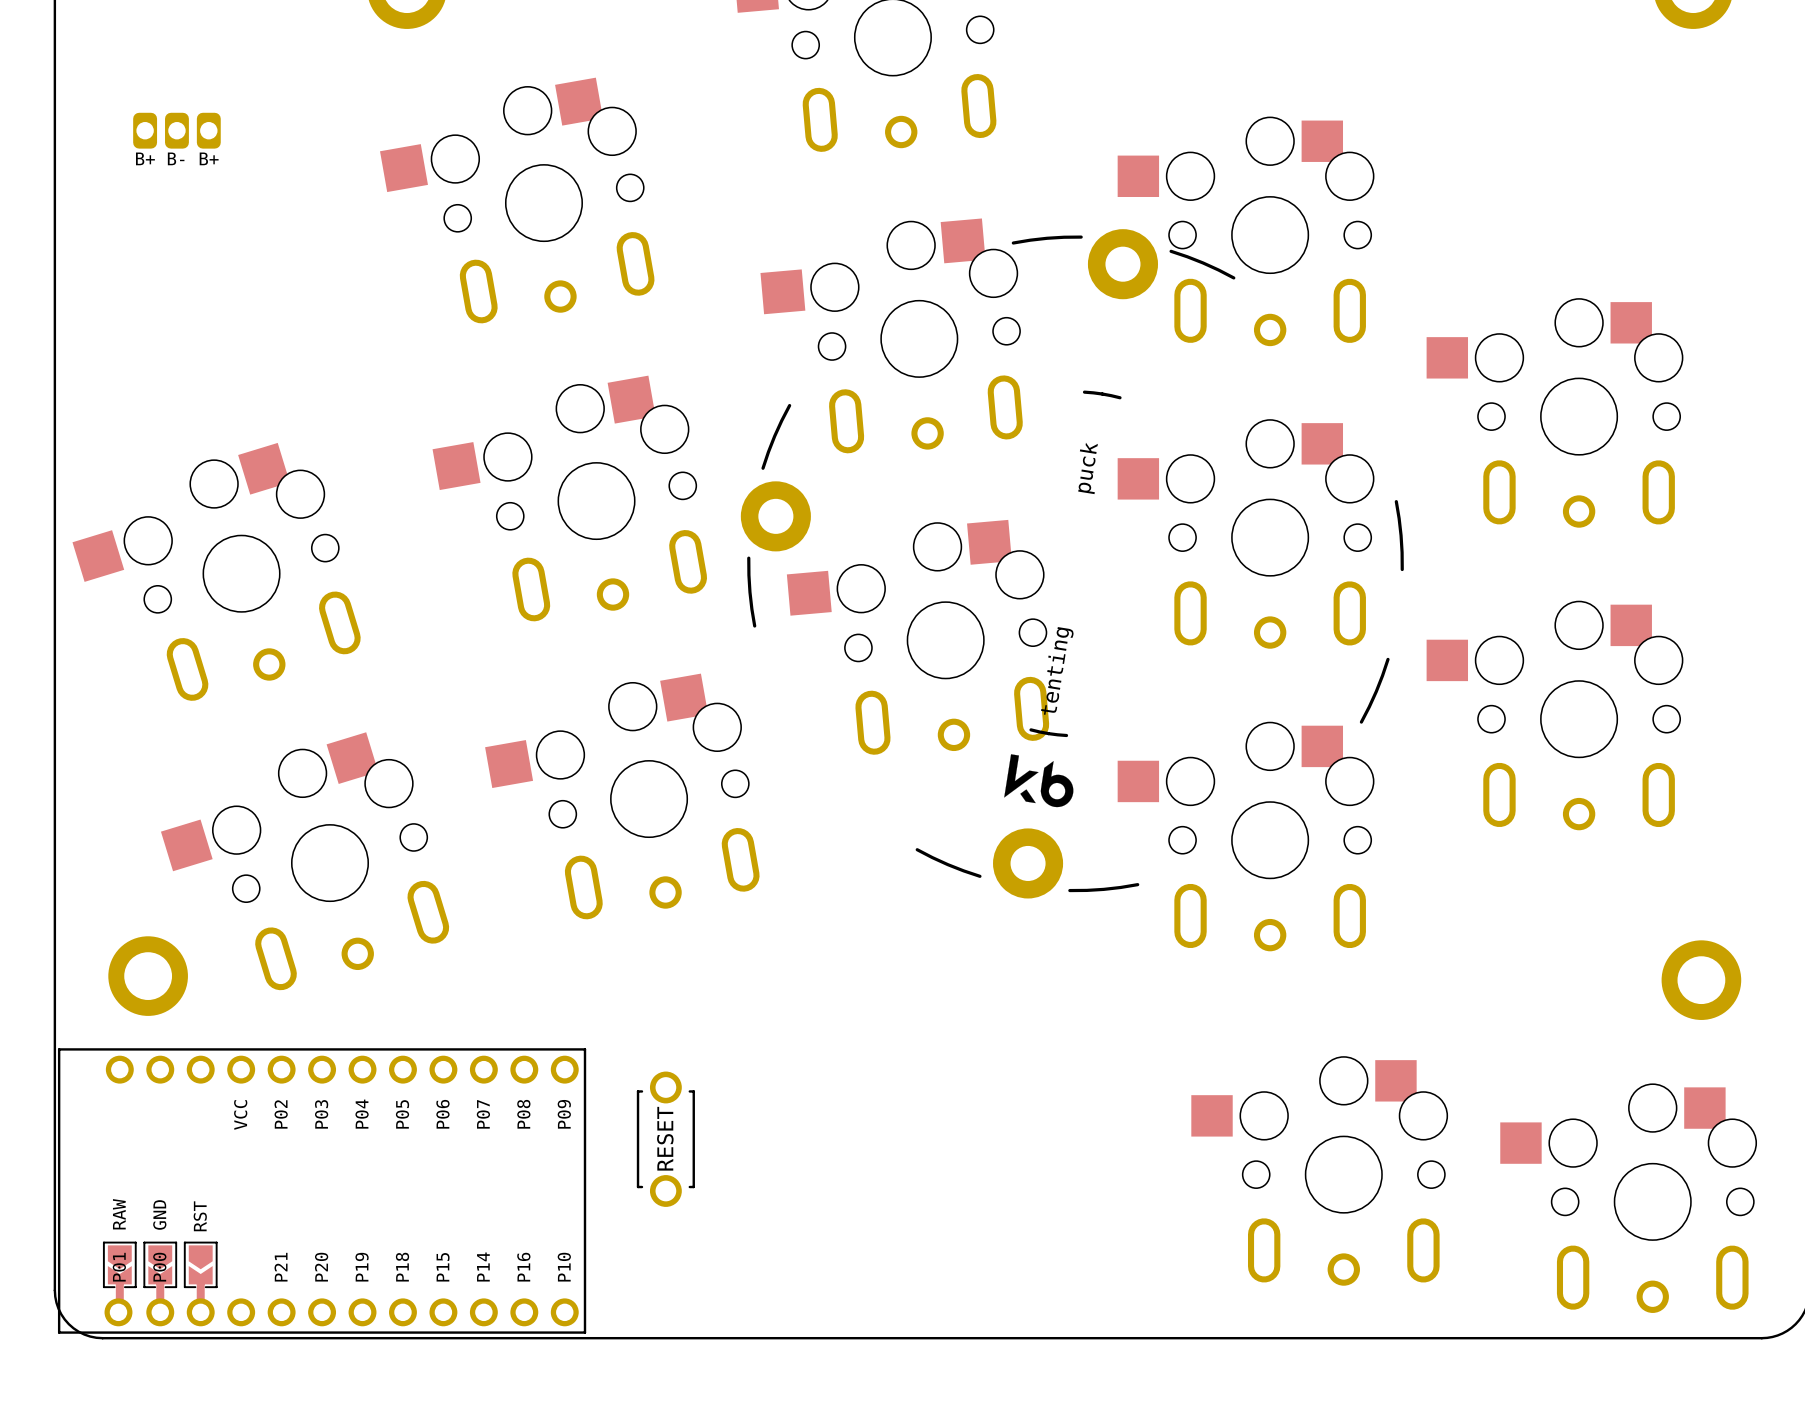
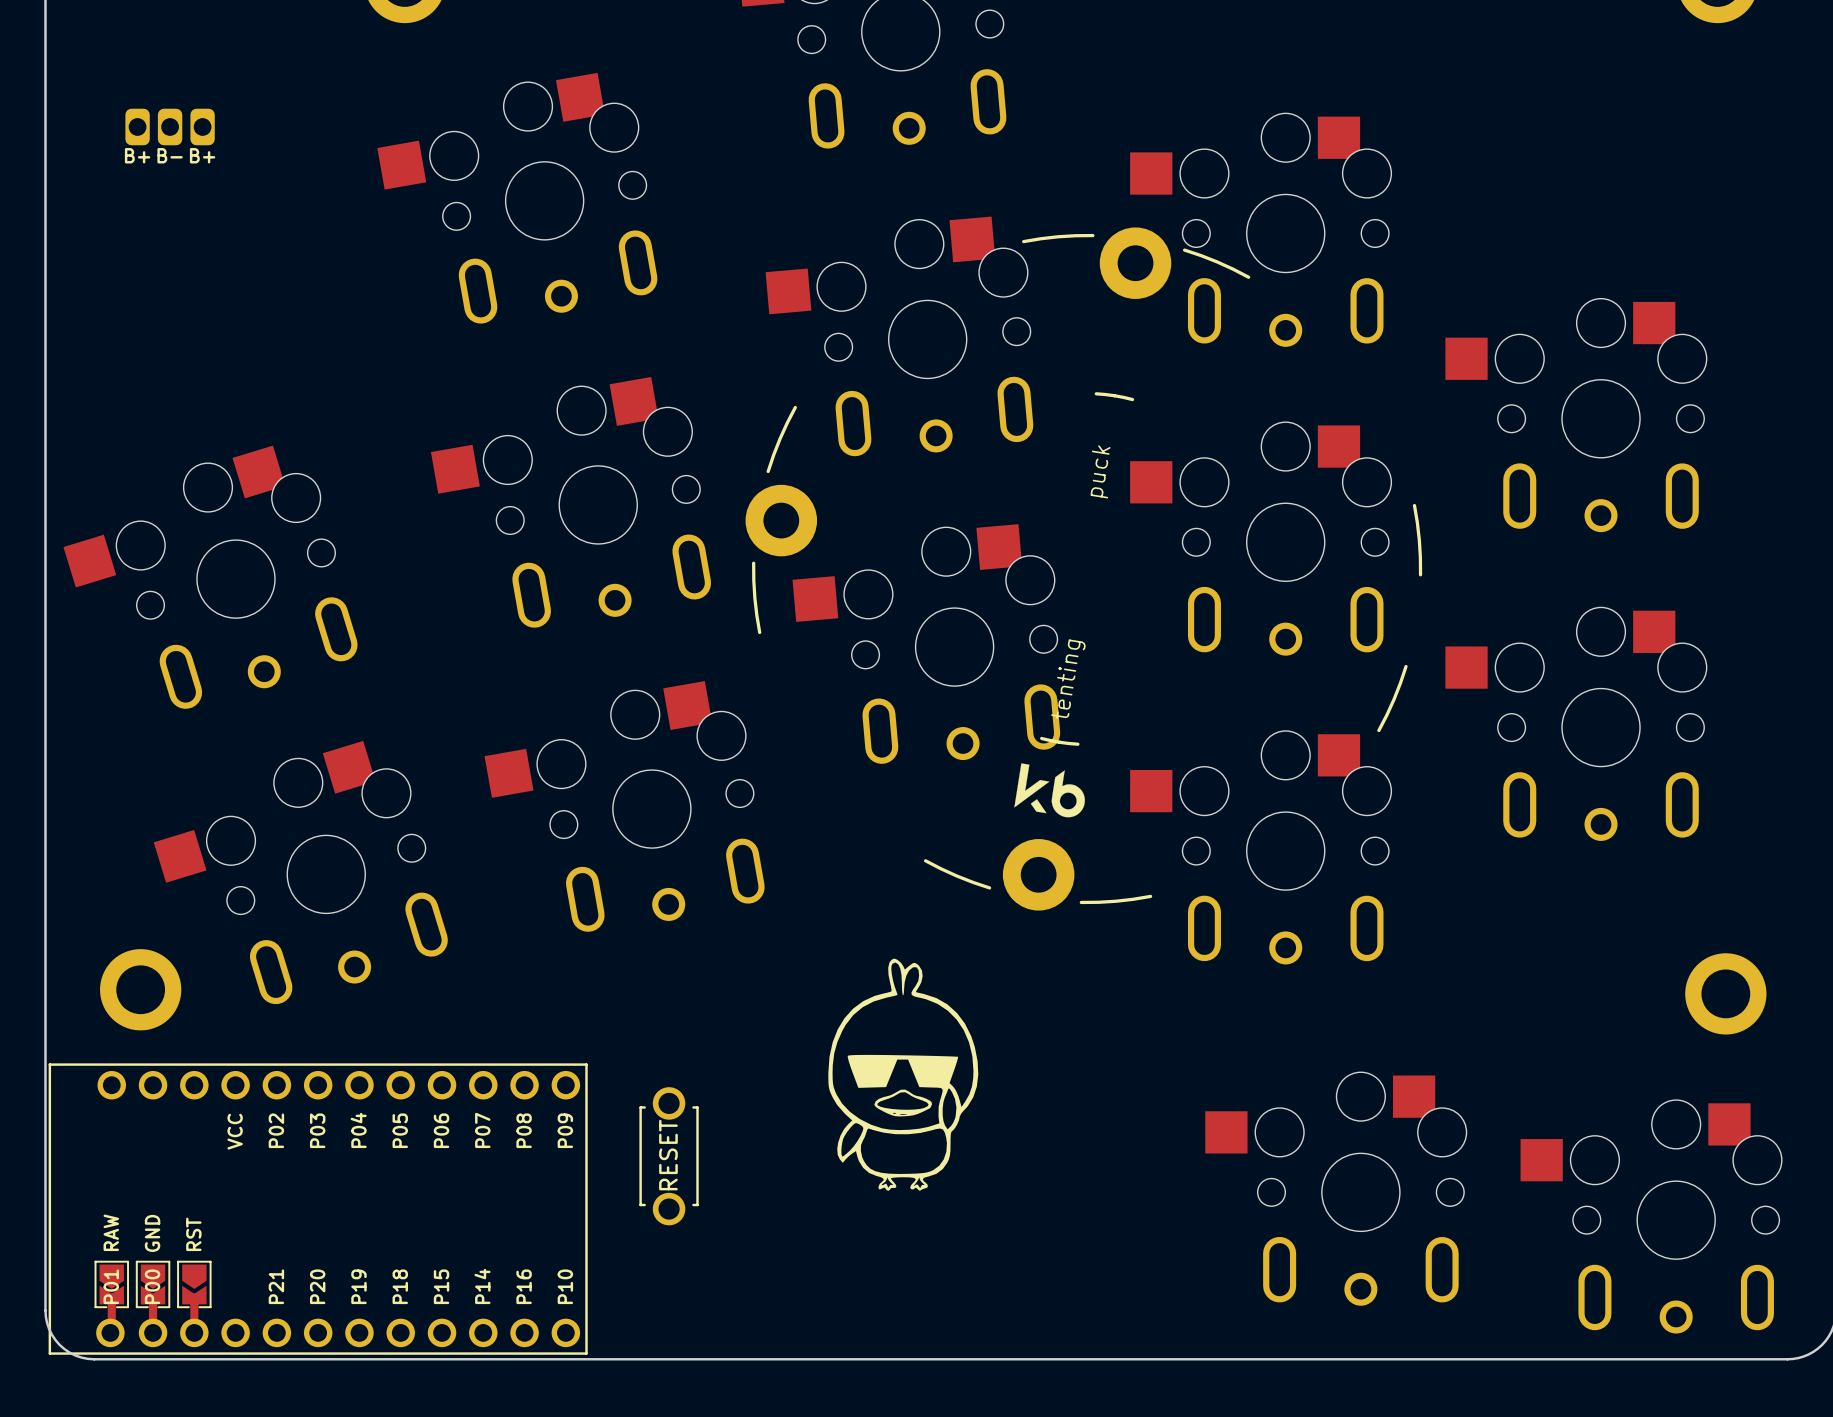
drawing: none -> [828, 958, 979, 1191]

